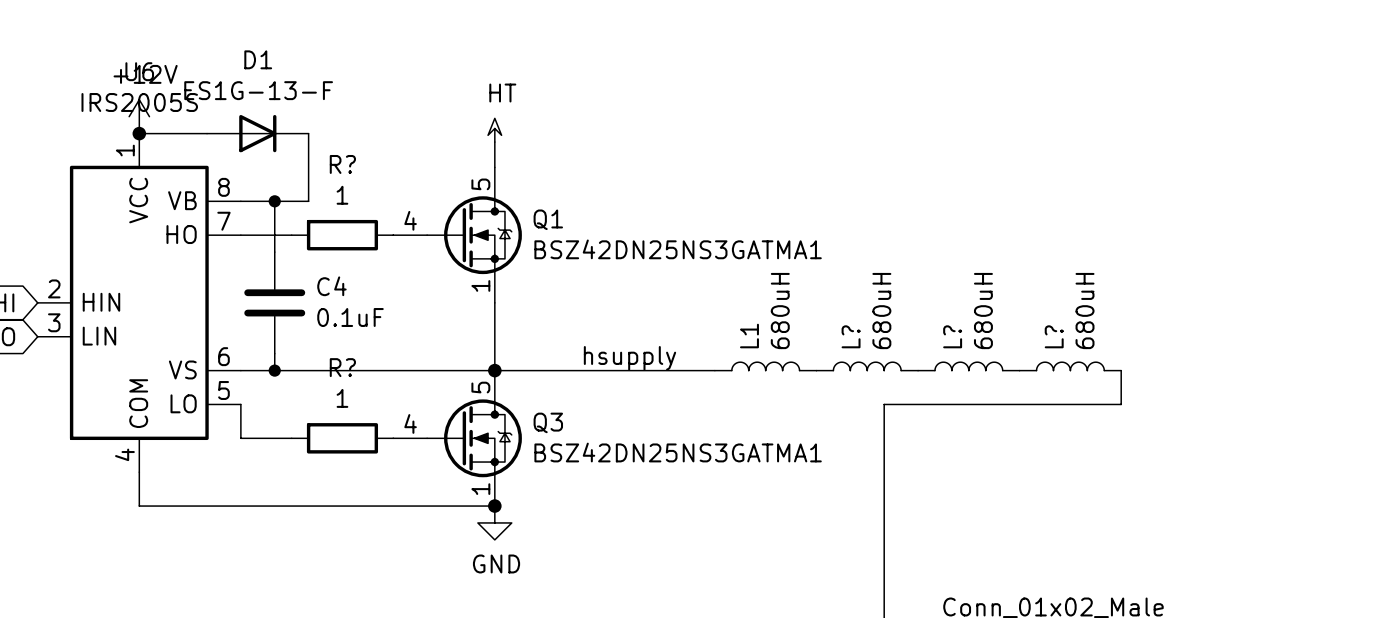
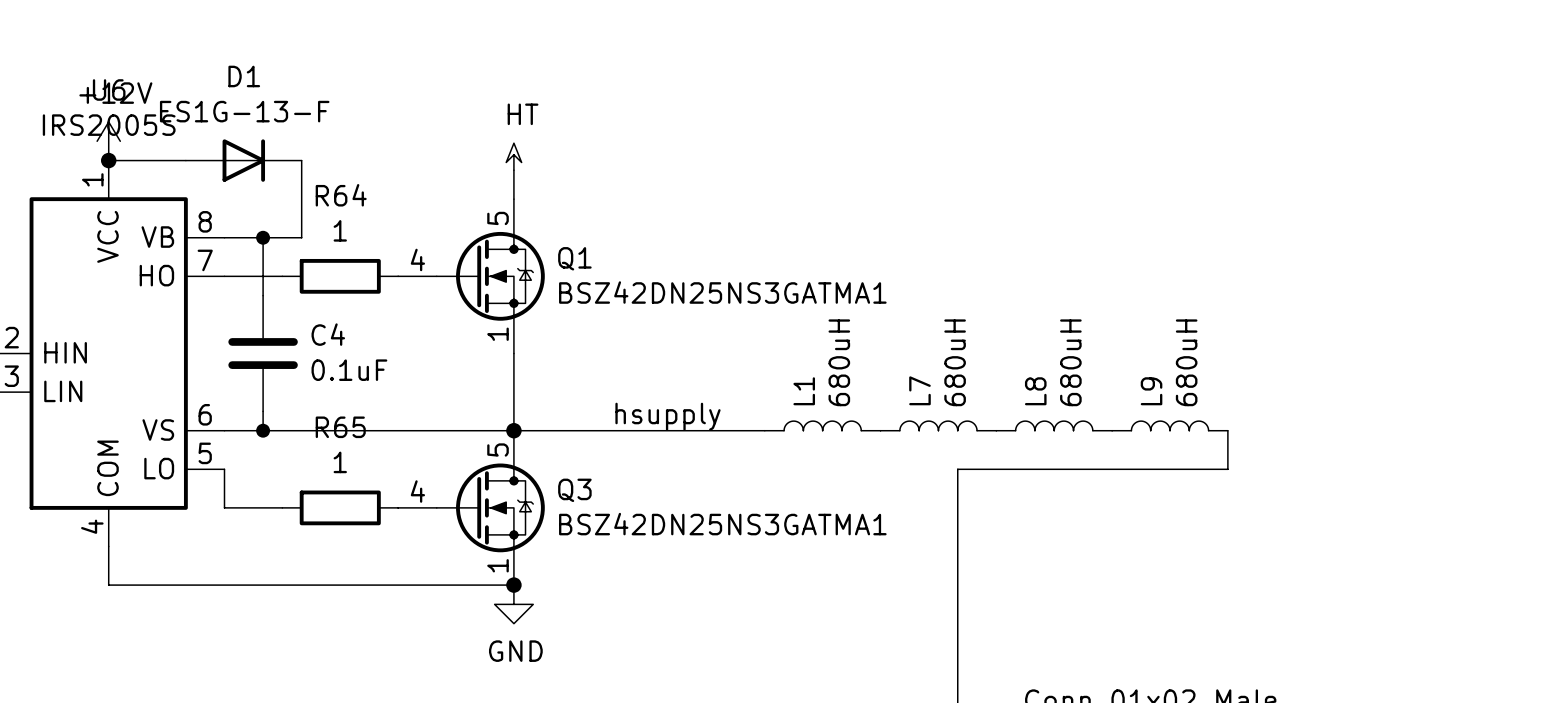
R? name: R? (342, 164) -> R64 (341, 195)
L? name: L? (851, 336) -> L7 (919, 390)
L? name: L? (952, 336) -> L8 (1035, 391)
L? name: L? (1054, 336) -> L9 (1151, 391)
R? name: R? (342, 367) -> R65 (340, 427)

